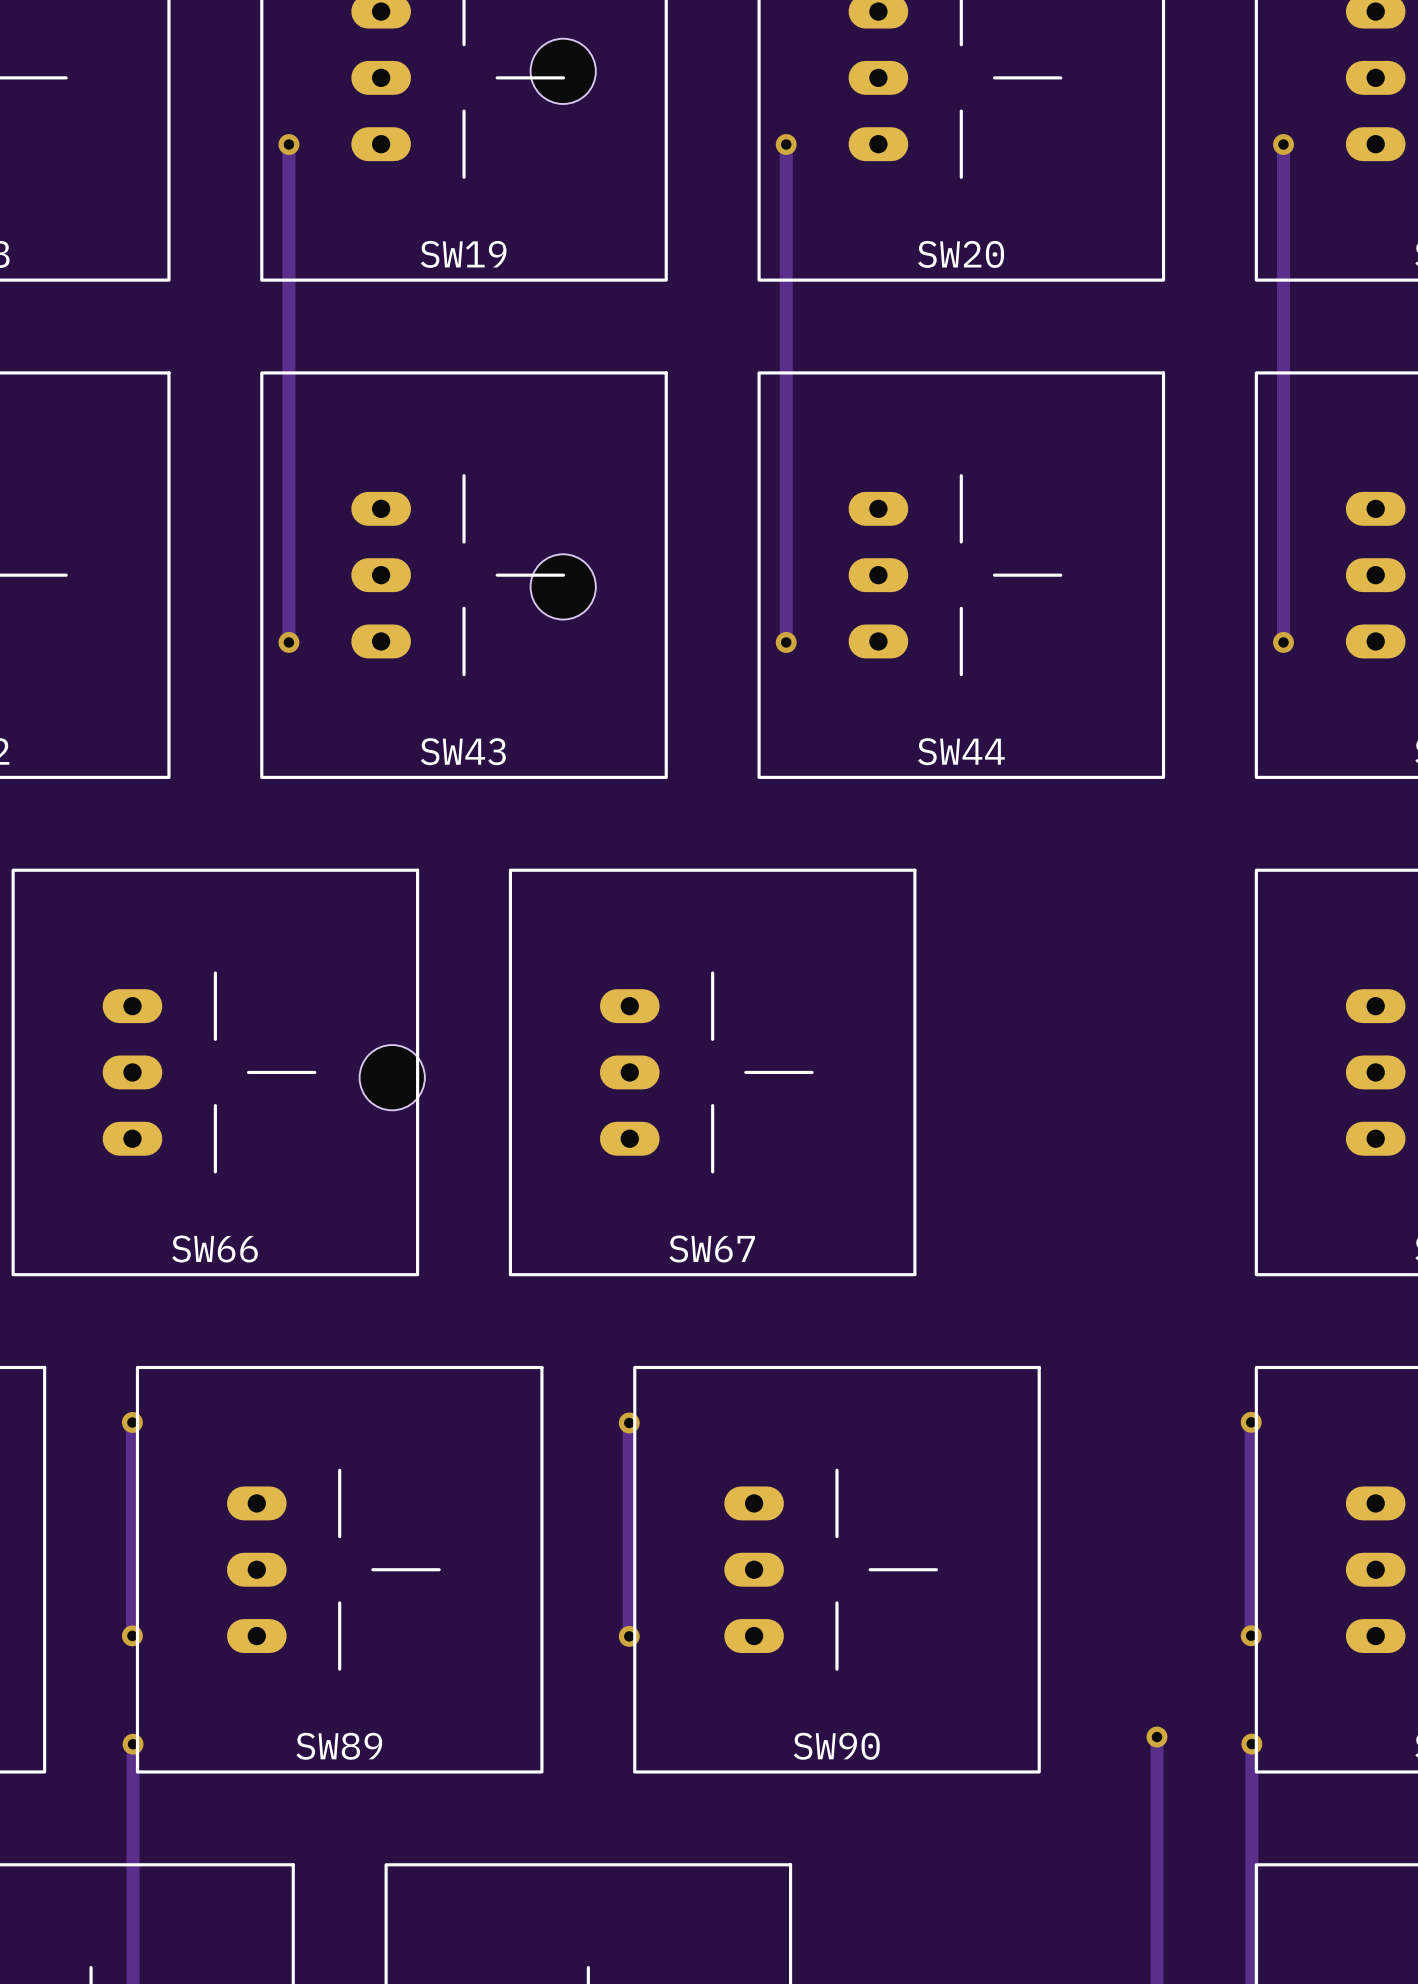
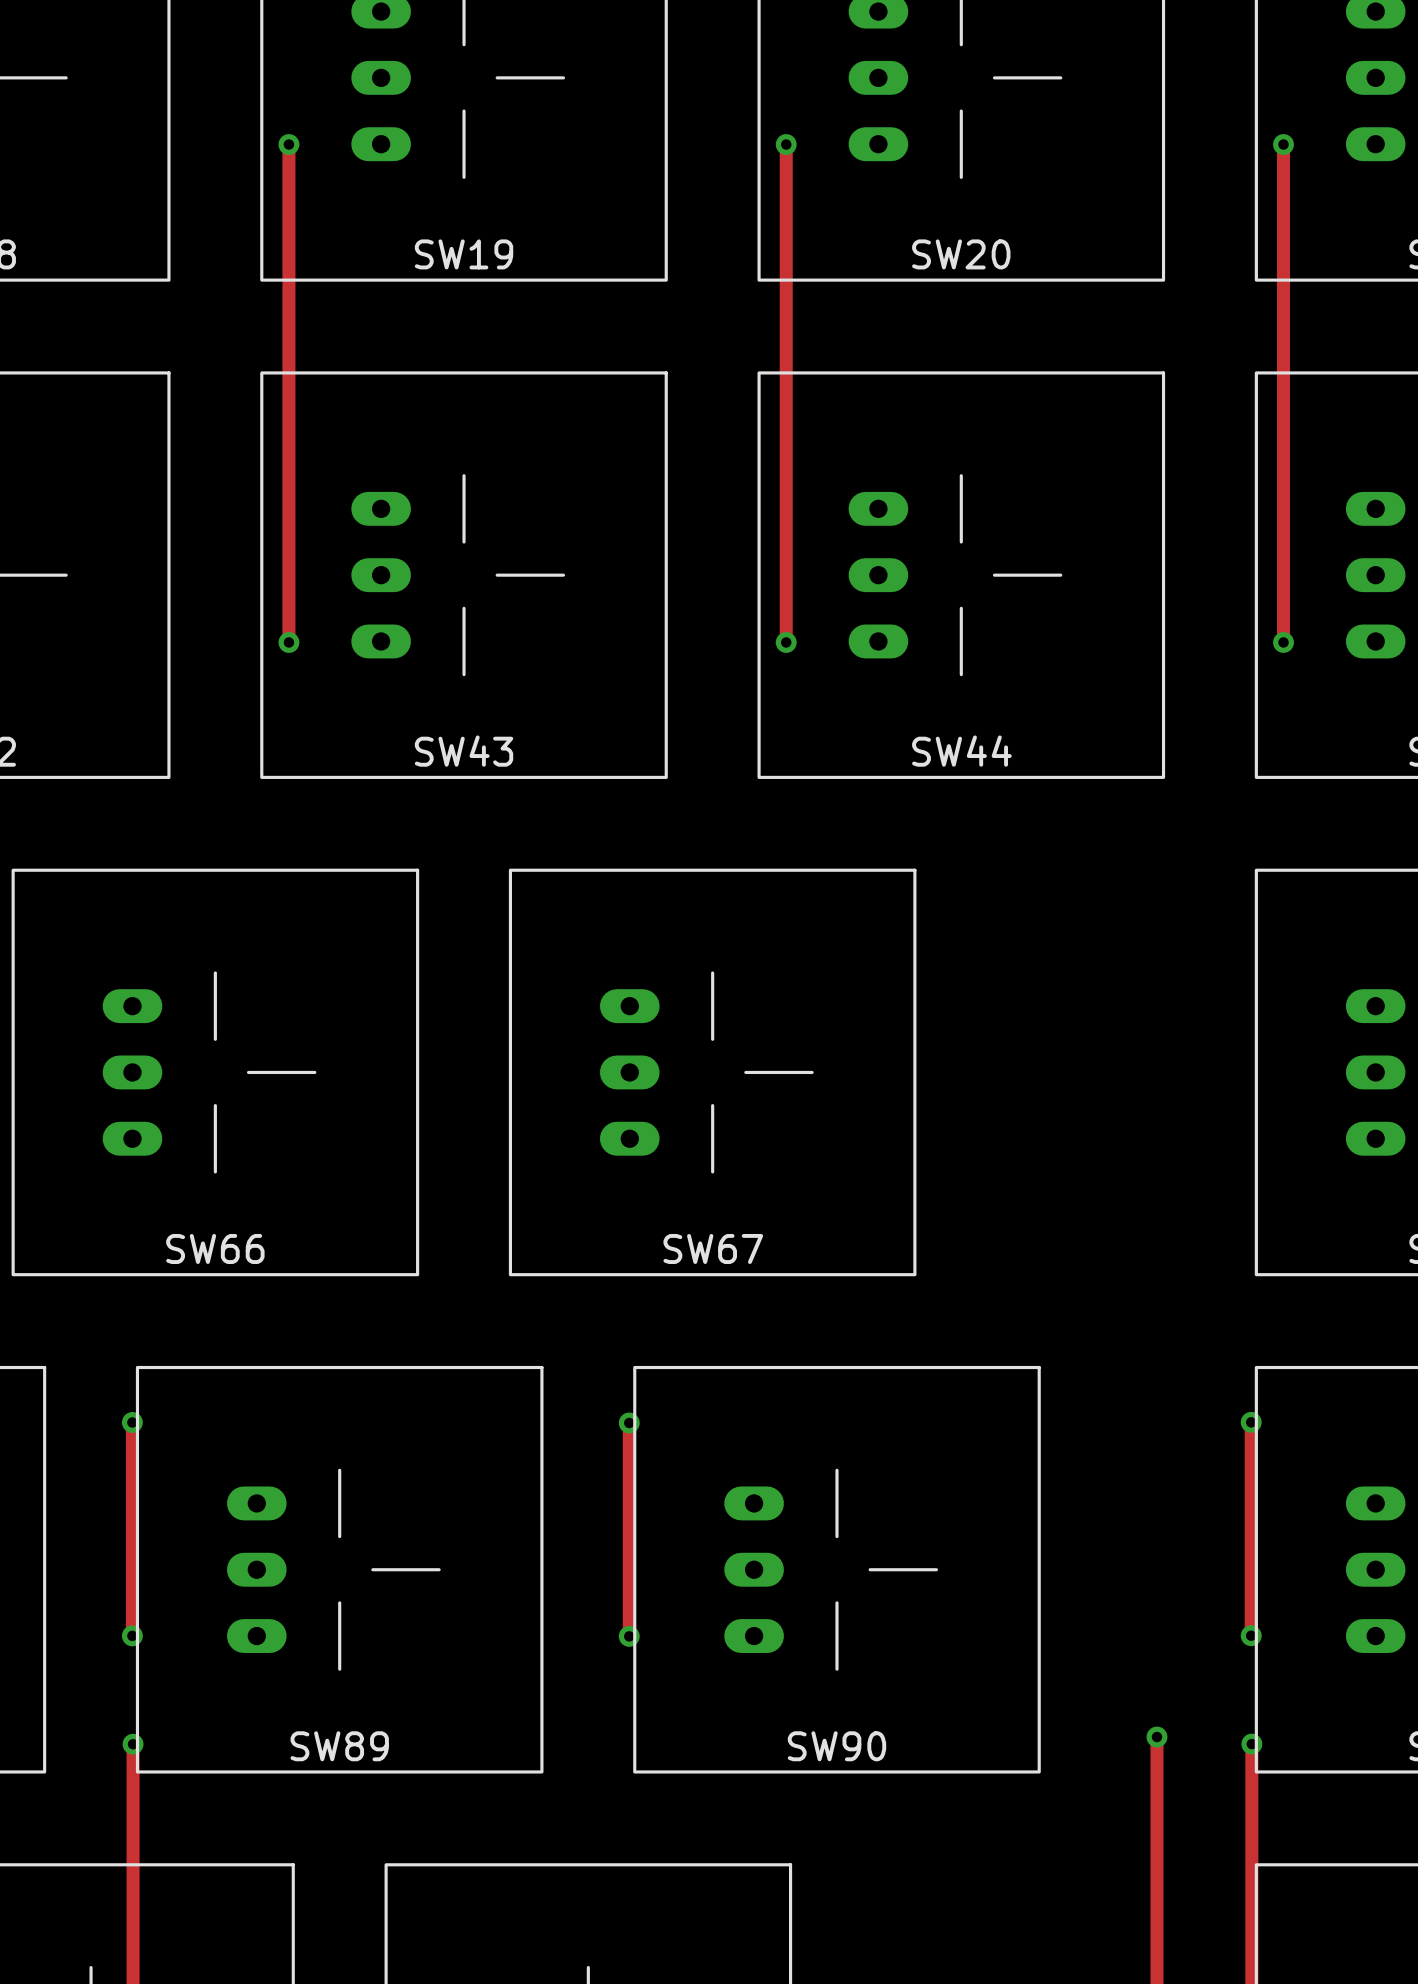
part: (563, 71) -> none
part: (563, 586) -> none
part: (392, 1077) -> none

